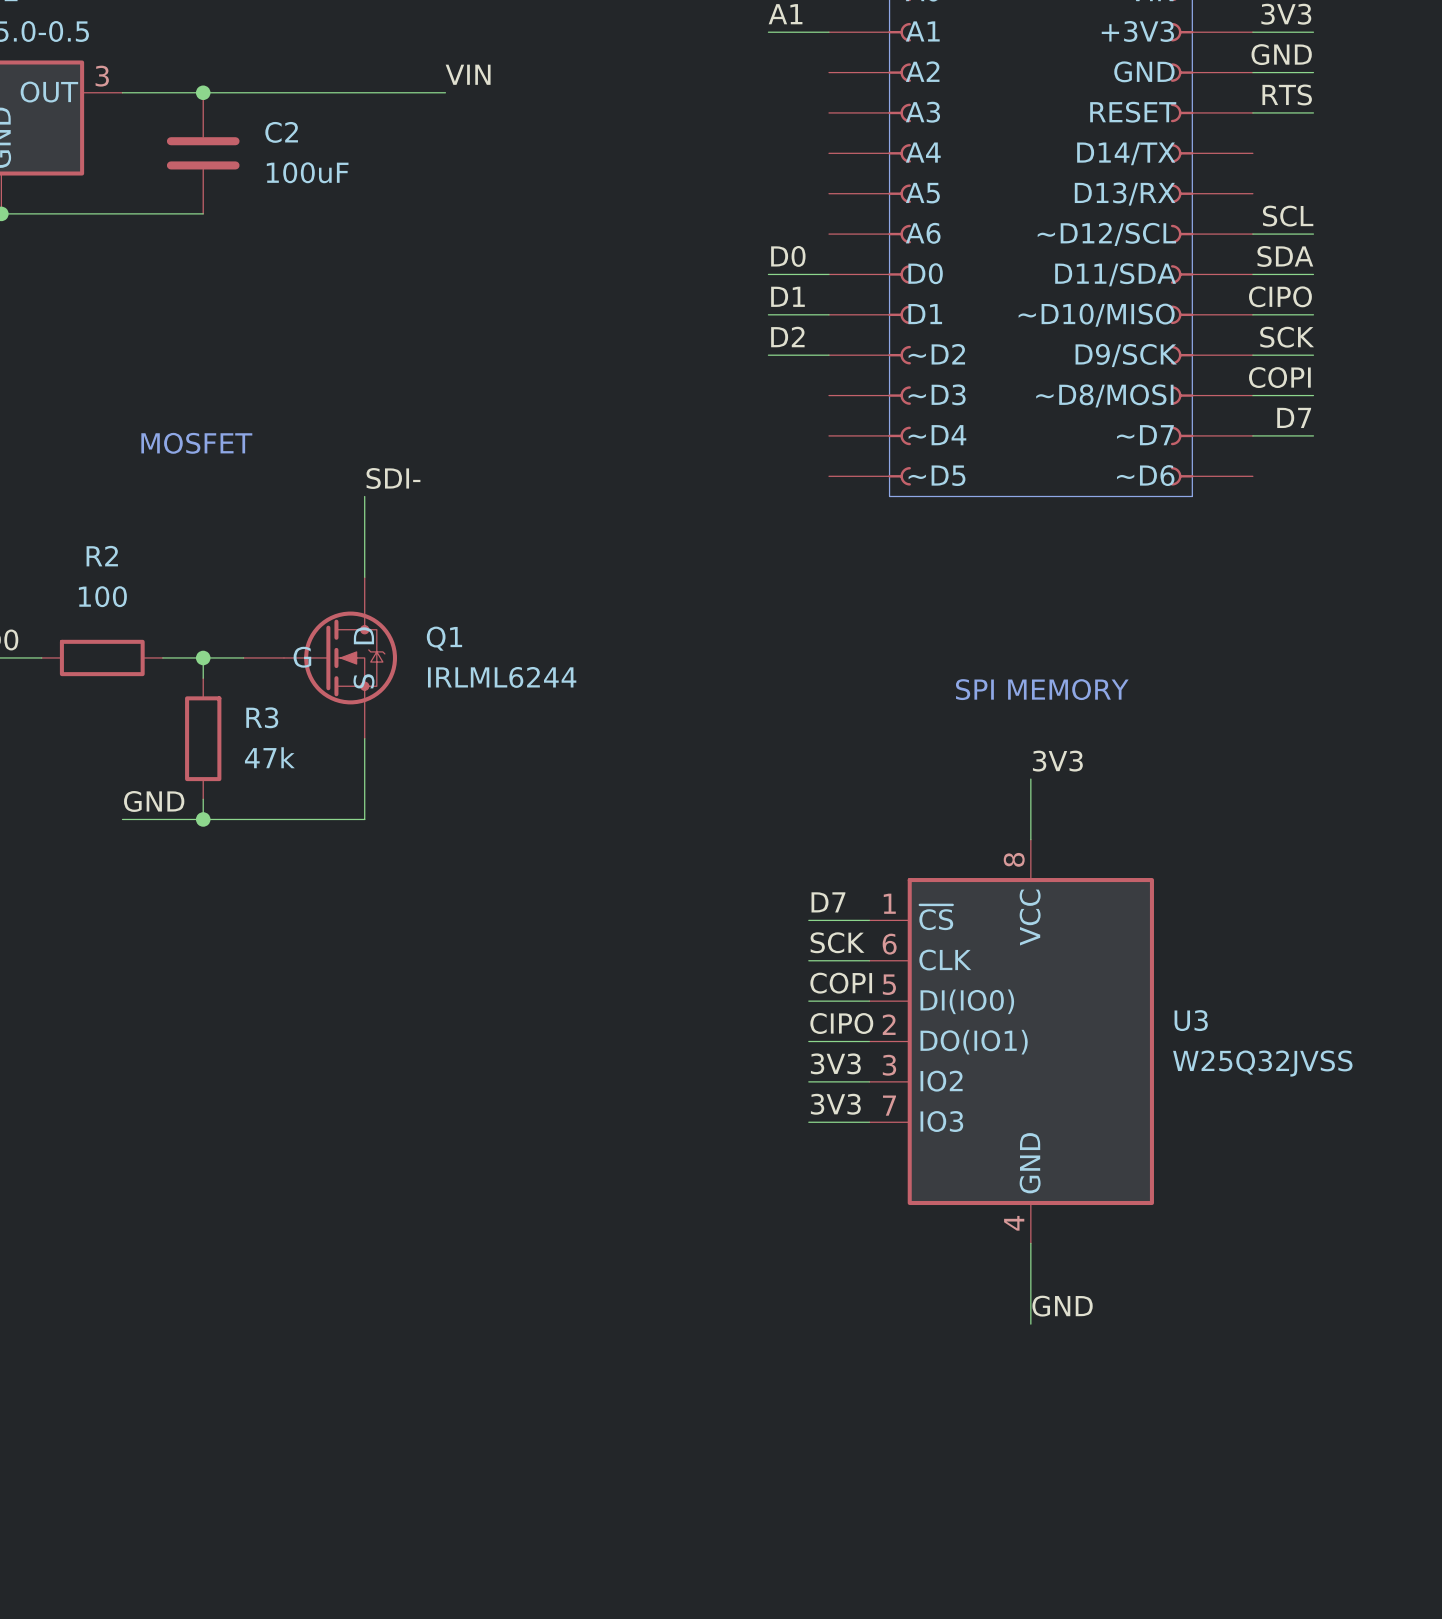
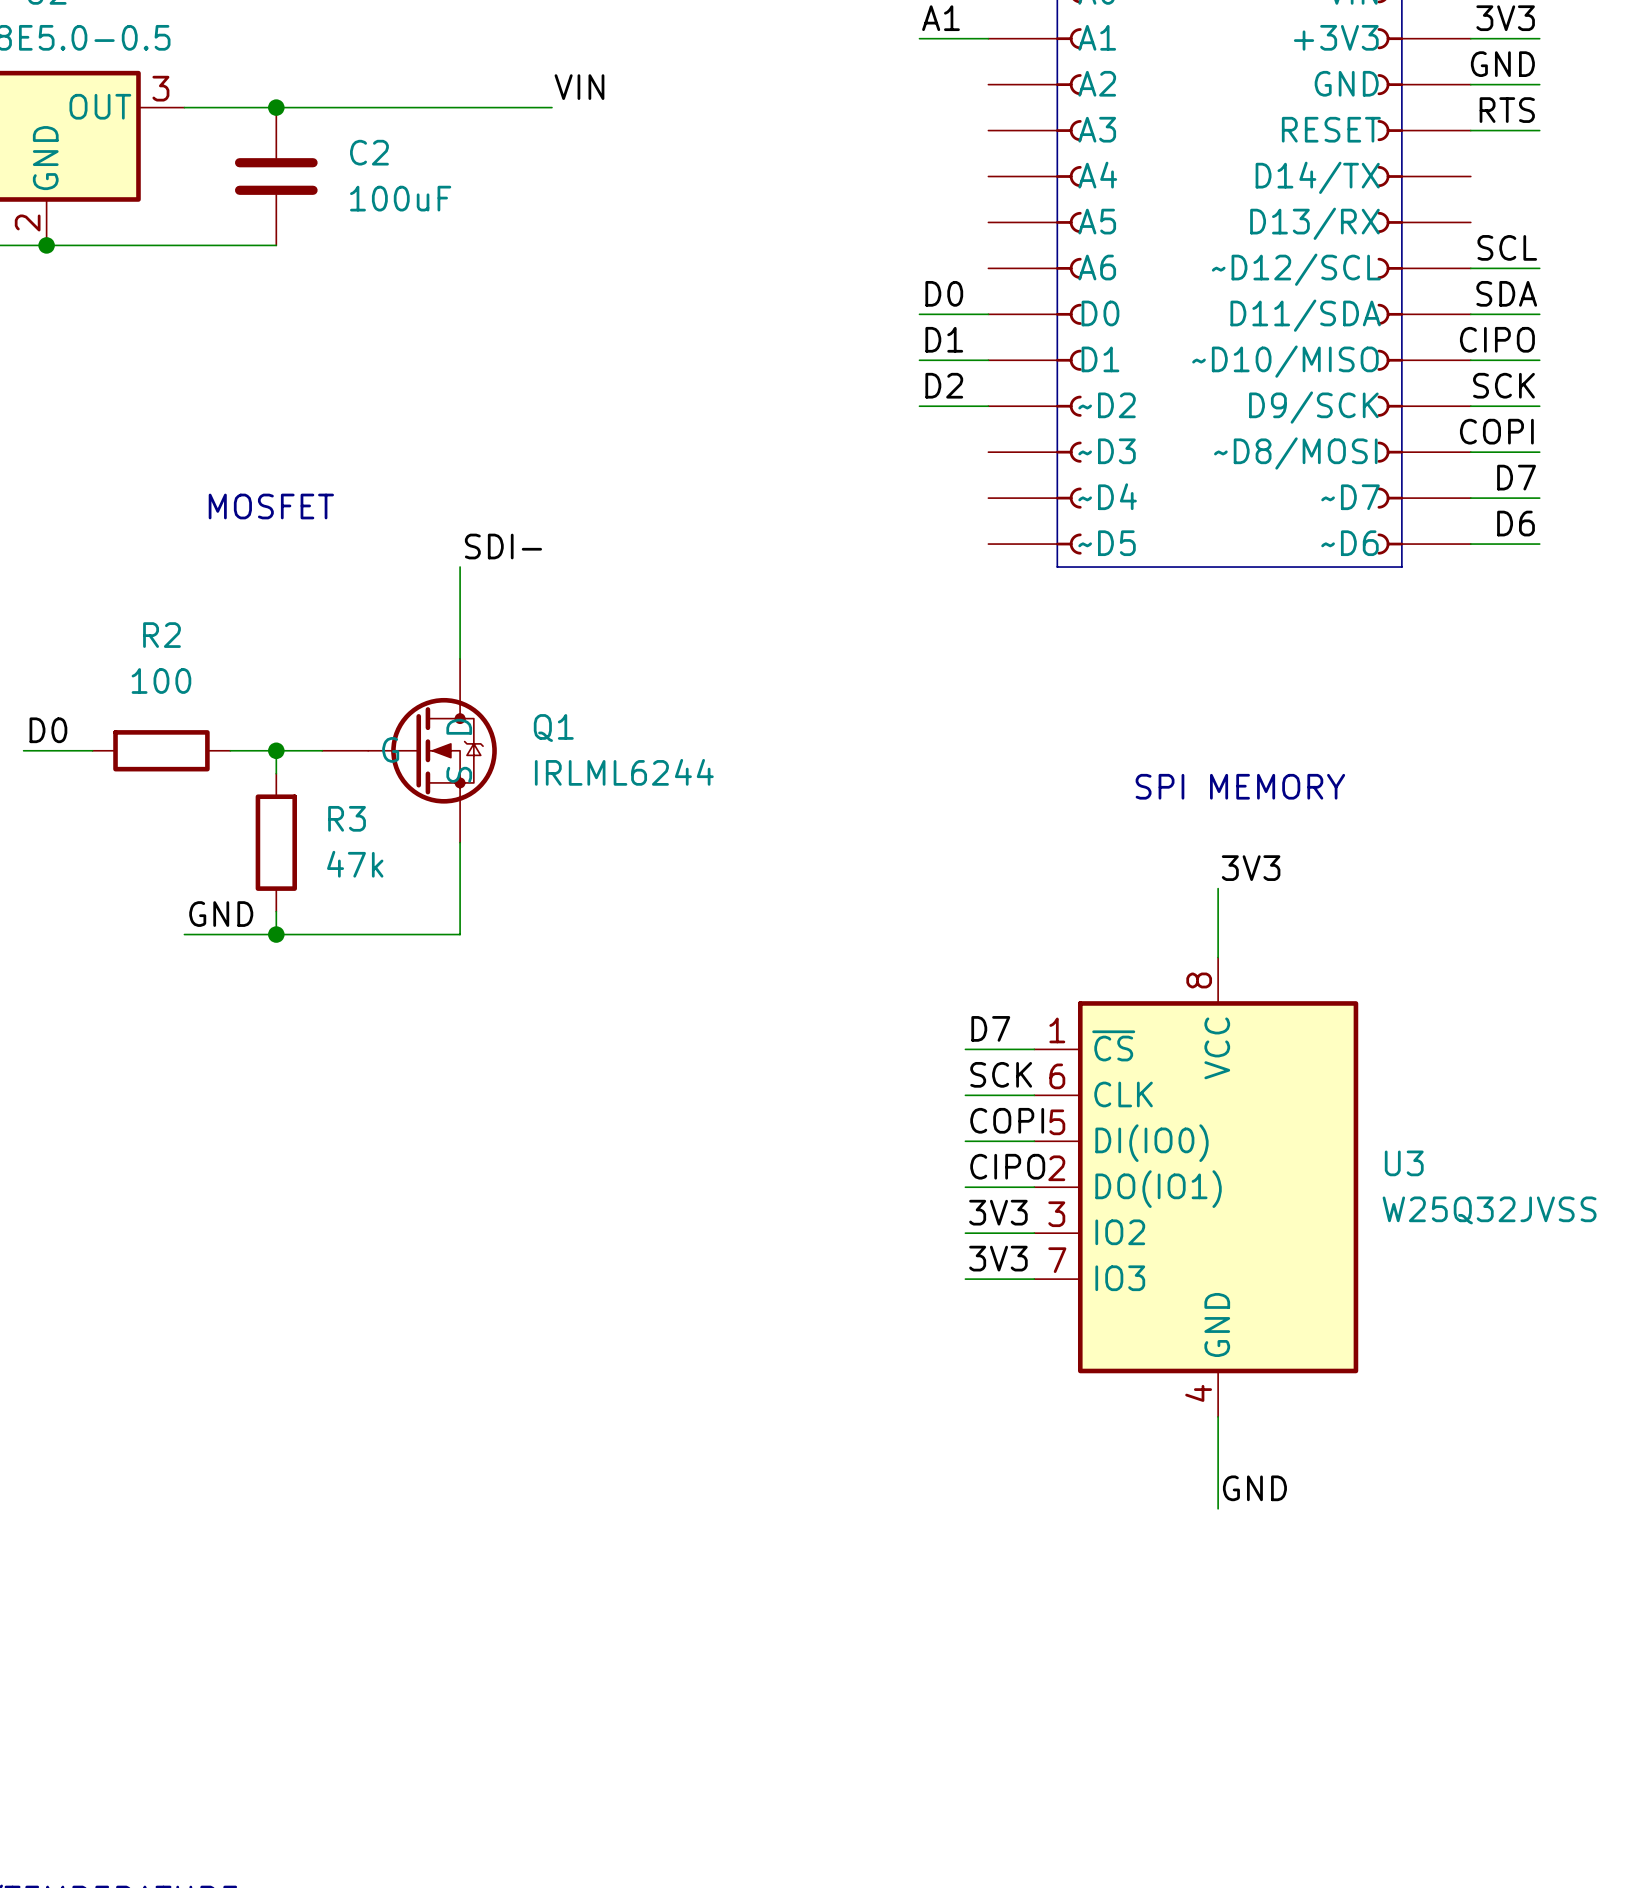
label: none -> D6 (1516, 523)
wire: none -> (1470, 544) (1539, 544)

